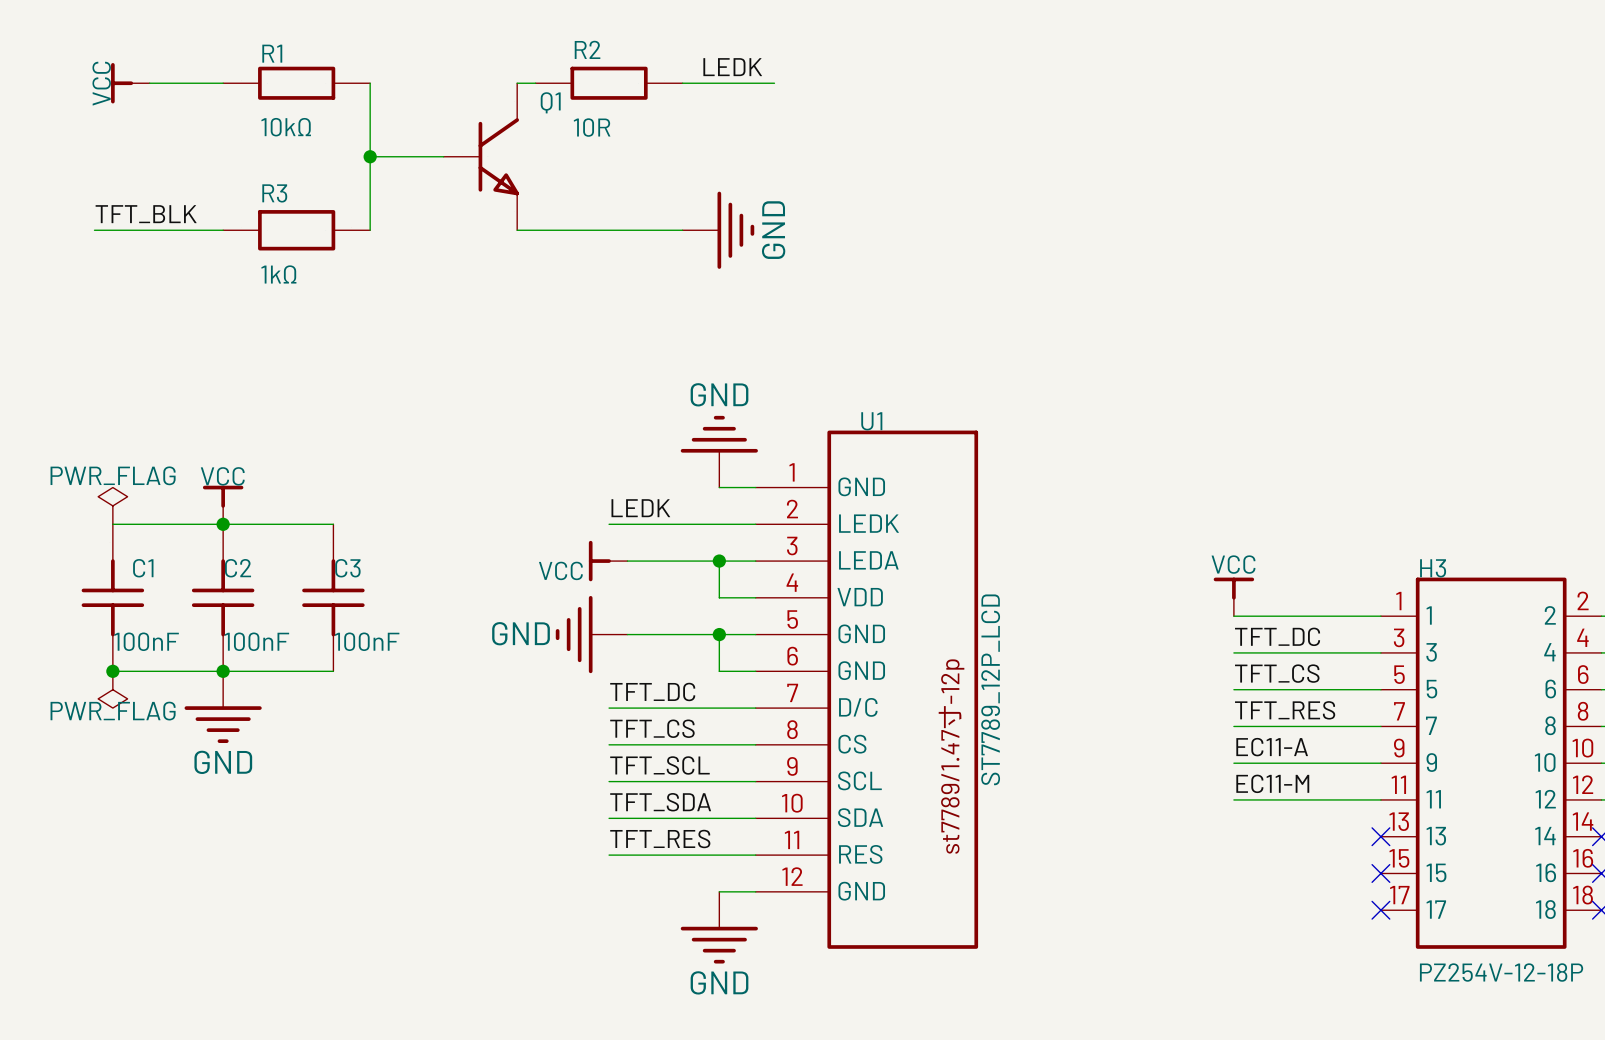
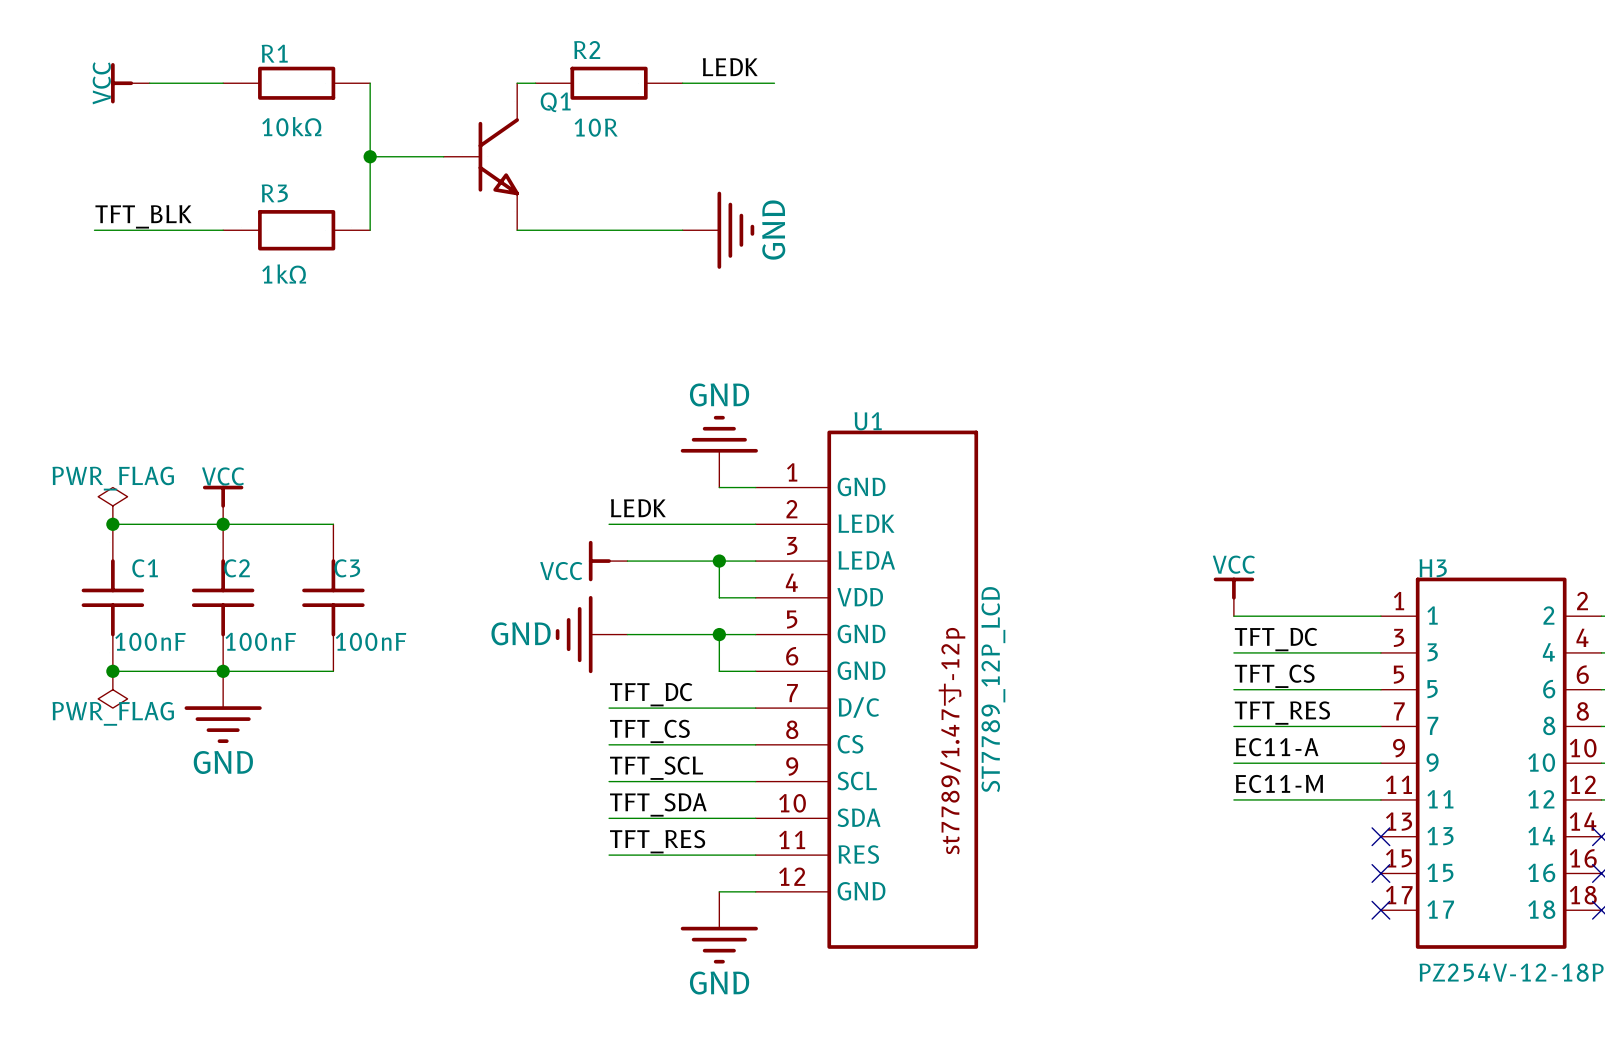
junction: none -> (112, 524)

